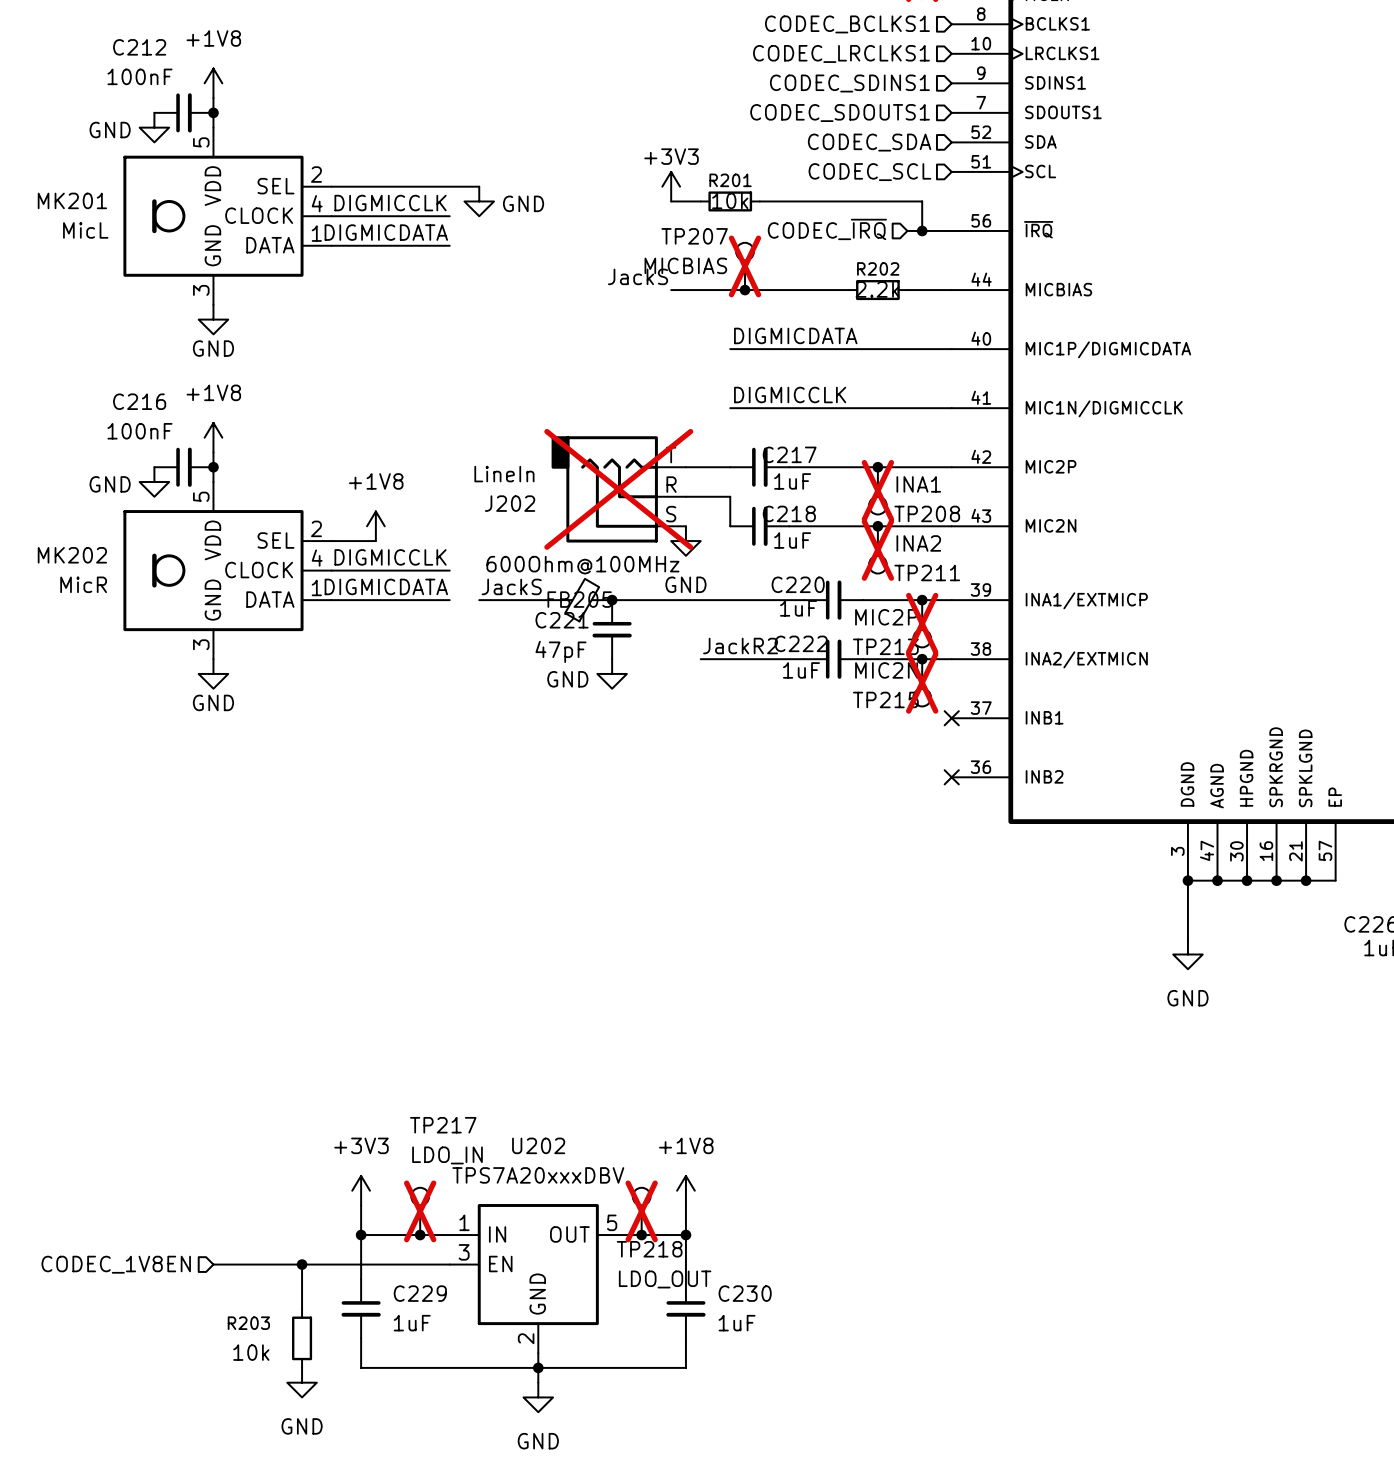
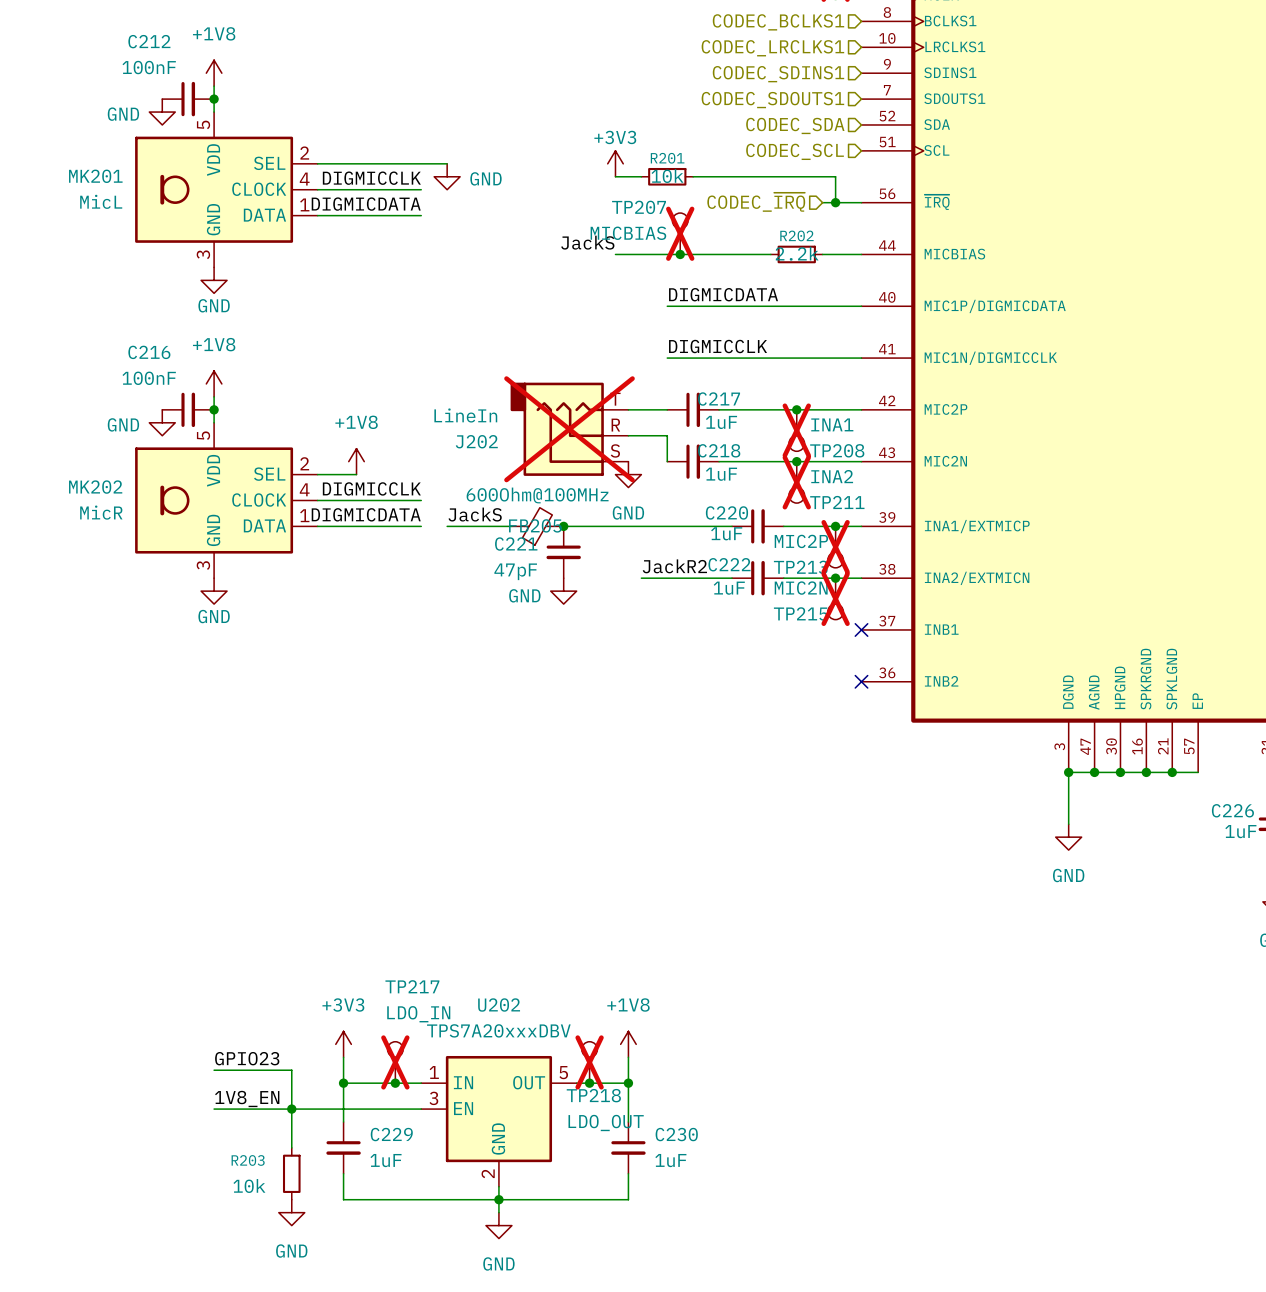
label: none -> GPIO23 (247, 1058)
wire: none -> (214, 1070) (291, 1070) (291, 1109)
label: none -> 1V8_EN (247, 1098)
hierarchical label: CODEC_1V8EN (116, 1264) -> none

